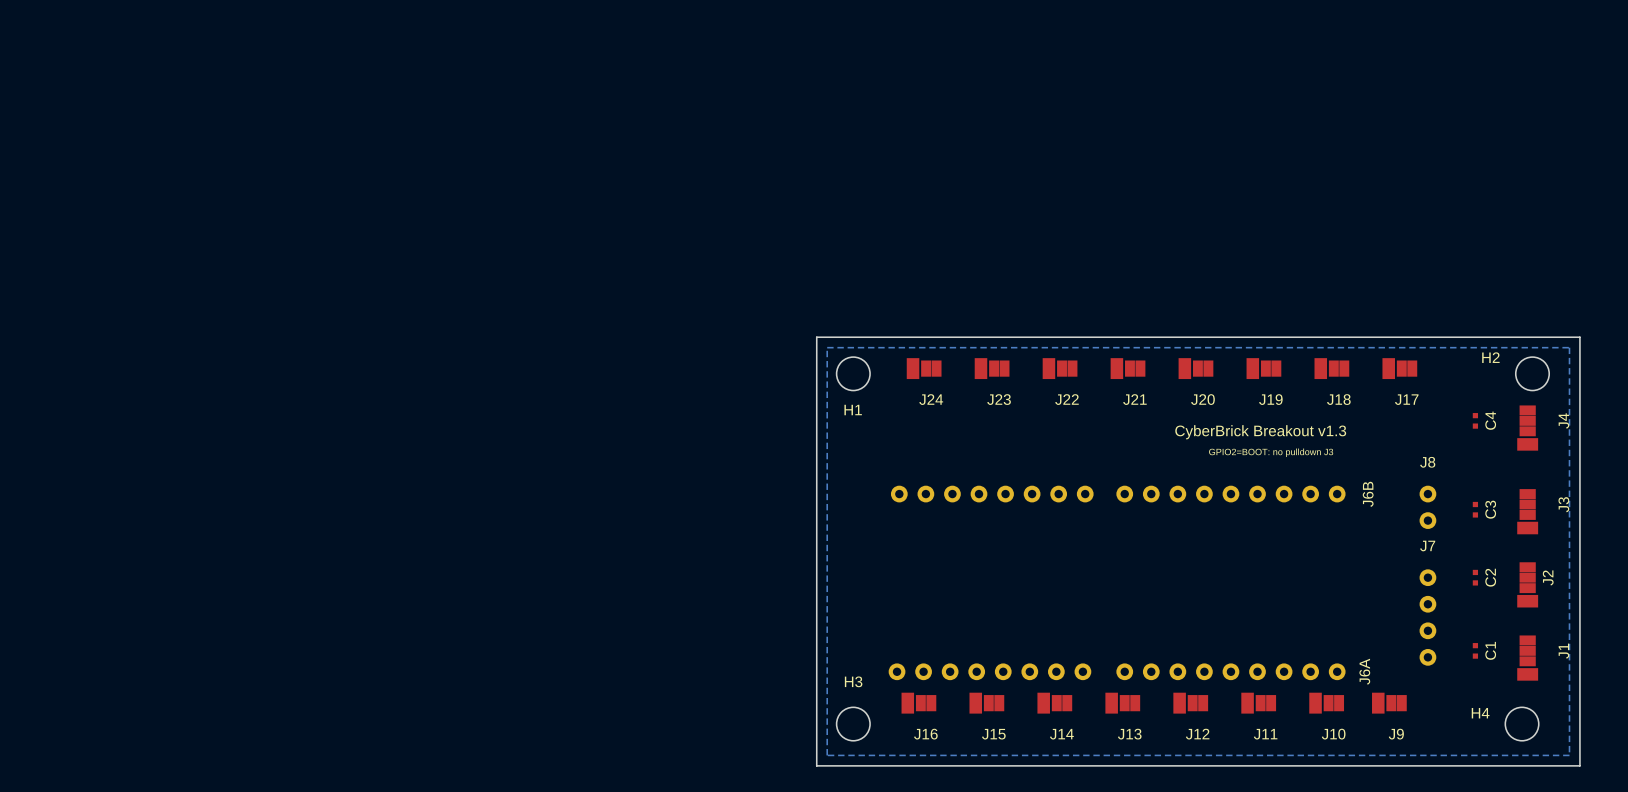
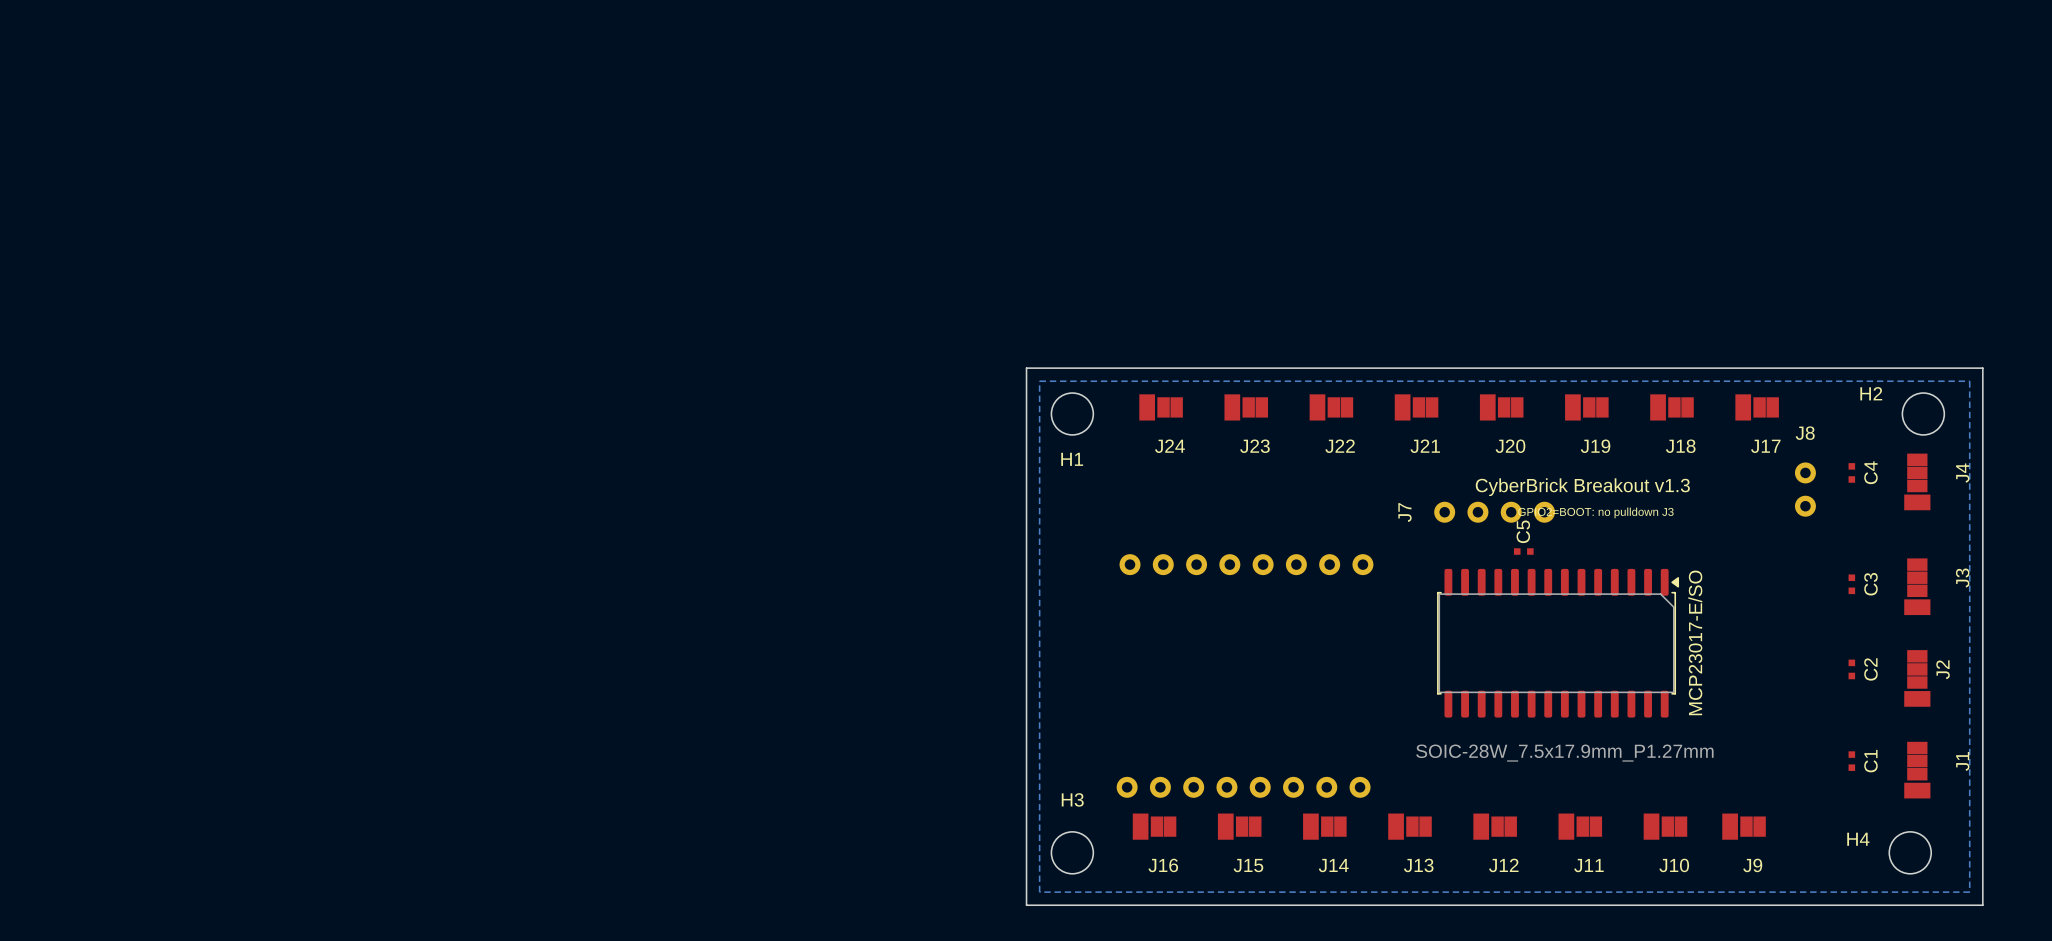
C5: none -> (1523, 551)
J6B: (1230, 494) -> none
J8 position: (1427, 507) -> (1805, 489)
J7 name position: J7 (1427, 546) -> J7 (1404, 512)
MCP23017-E/SO: none -> SOIC-28W_7.5x17.9mm_P1.27mm (1558, 643)
J7 rotation: 0° (1427, 617) -> 90° clockwise (1494, 512)
J7 position: (1427, 617) -> (1494, 512)
J6A: (1230, 671) -> none

